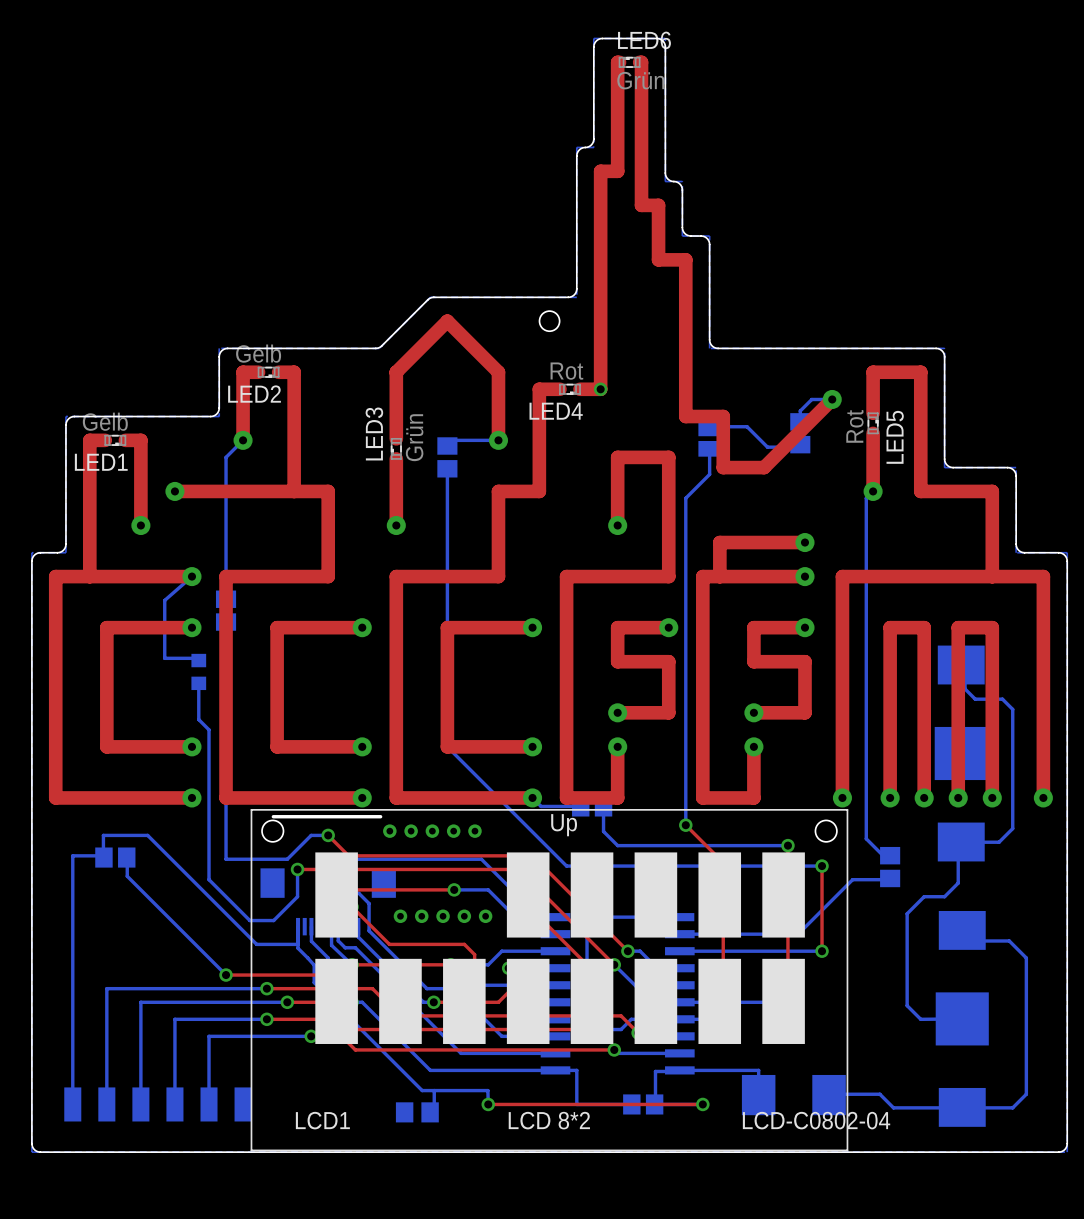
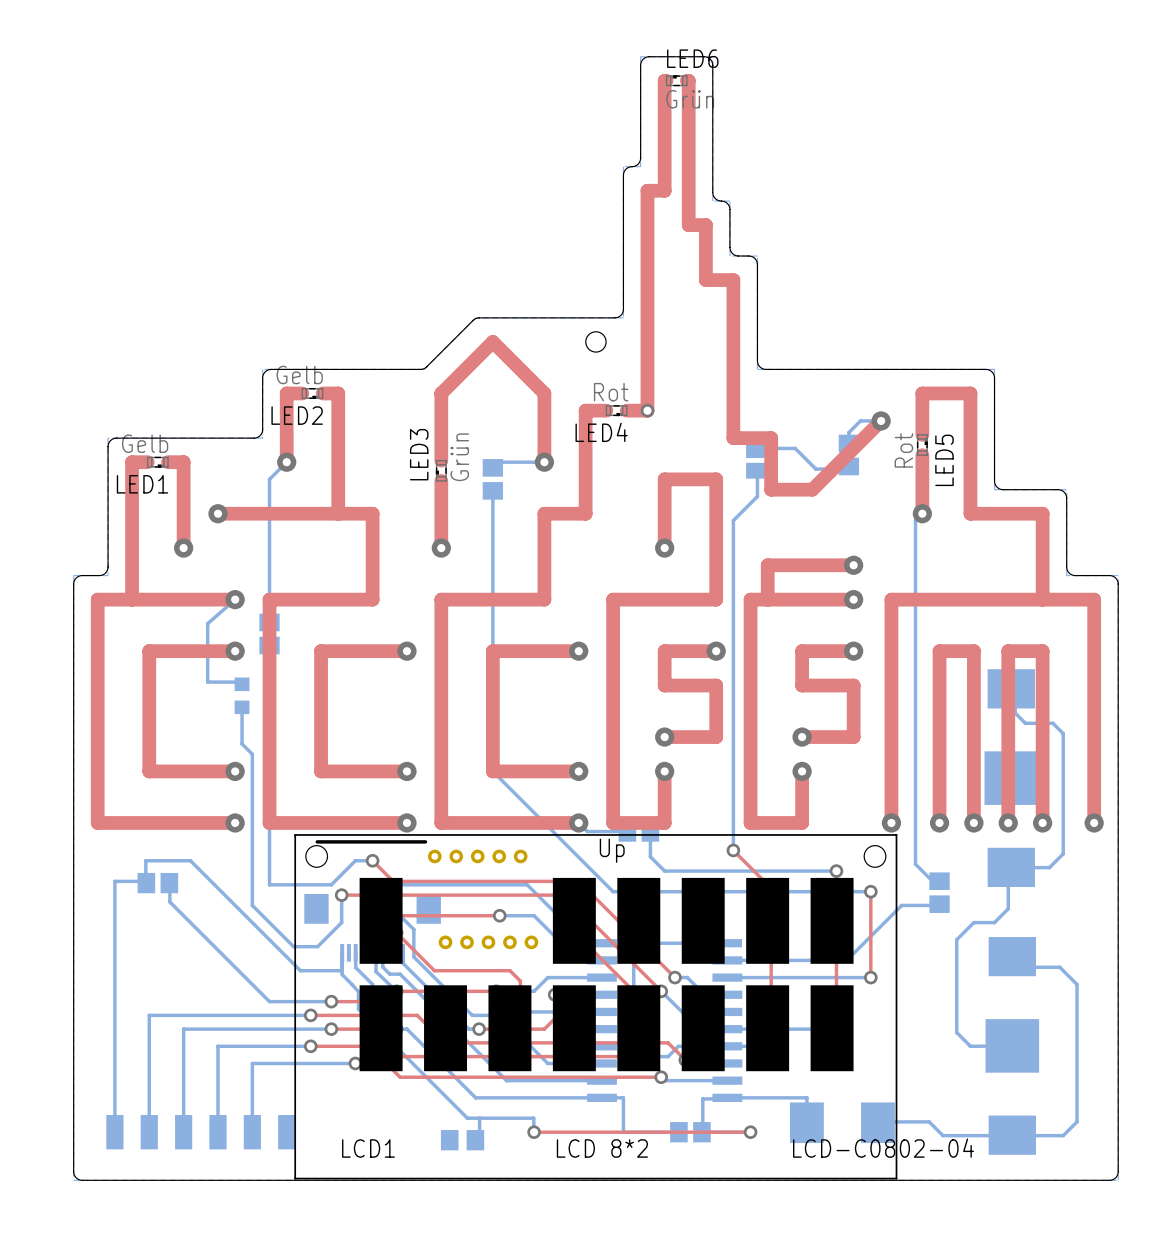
bottom track: none -> (269, 1001) (331, 1001)
top track: (226, 975) (287, 975) -> none
via position: (226, 975) -> (331, 1001)

